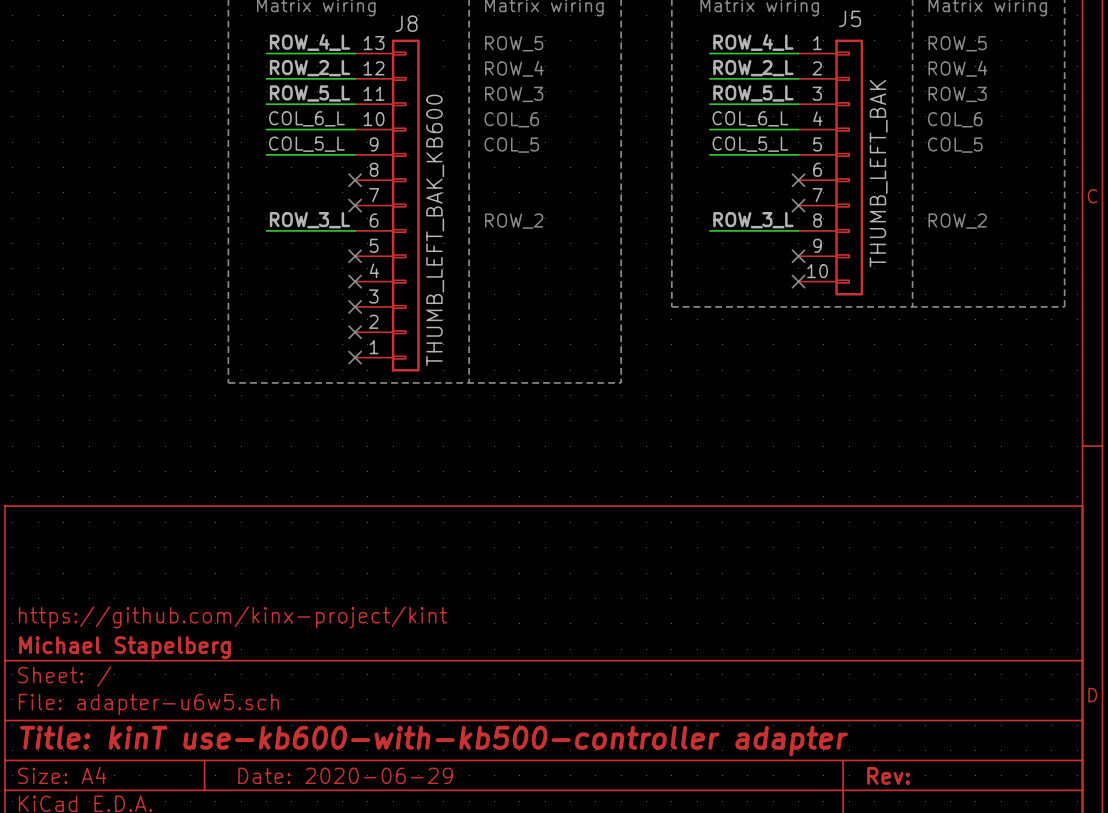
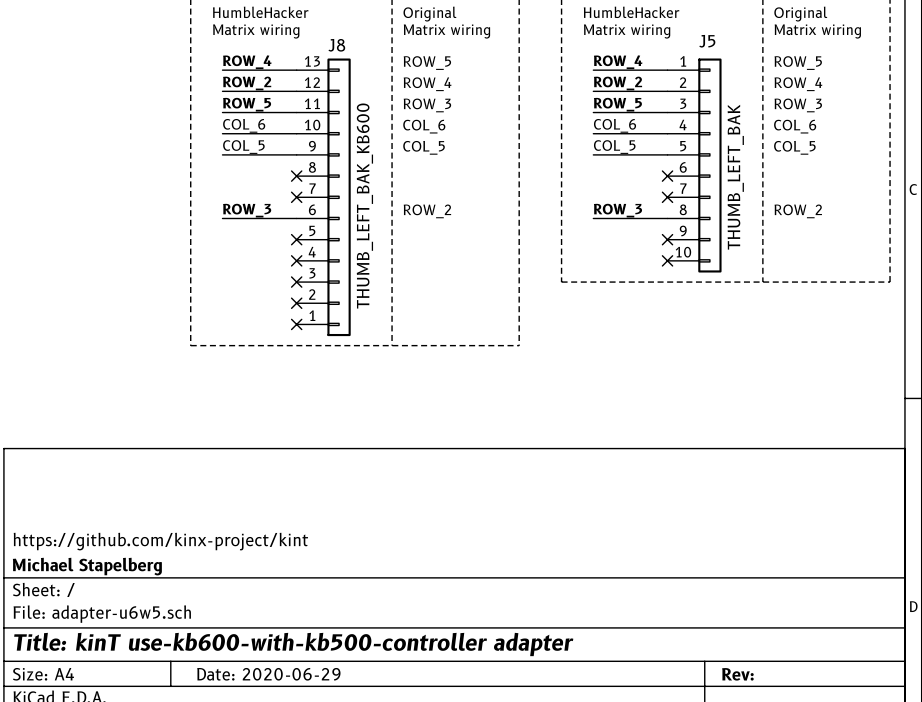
label: ROW_4_L (309, 42) -> ROW_4 (247, 62)
label: ROW_4_L (753, 42) -> ROW_4 (618, 62)
label: ROW_2_L (309, 68) -> ROW_2 (247, 83)
label: ROW_2_L (753, 68) -> ROW_2 (618, 83)
label: ROW_5_L (309, 93) -> ROW_5 (247, 104)
label: ROW_5_L (753, 93) -> ROW_5 (617, 104)
label: COL_6_L (306, 118) -> COL_6 (244, 125)
label: COL_6_L (750, 118) -> COL_6 (615, 125)
label: COL_5_L (306, 144) -> COL_5 (243, 147)
label: COL_5_L (750, 144) -> COL_5 (614, 147)
label: ROW_3_L (309, 220) -> ROW_3 (247, 210)
label: ROW_3_L (753, 220) -> ROW_3 (617, 210)

